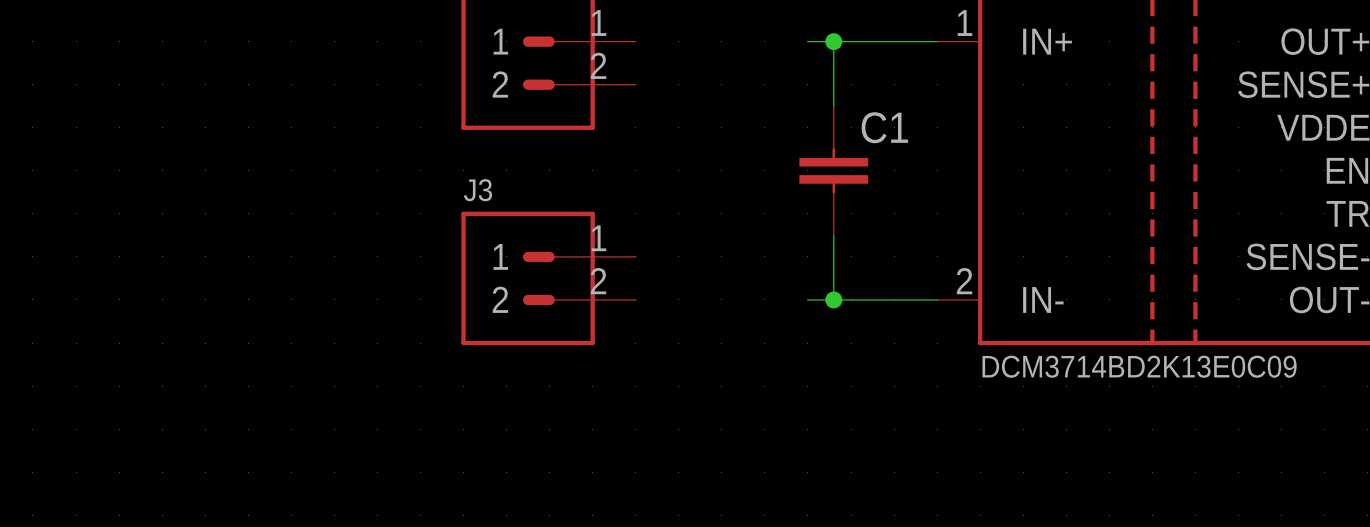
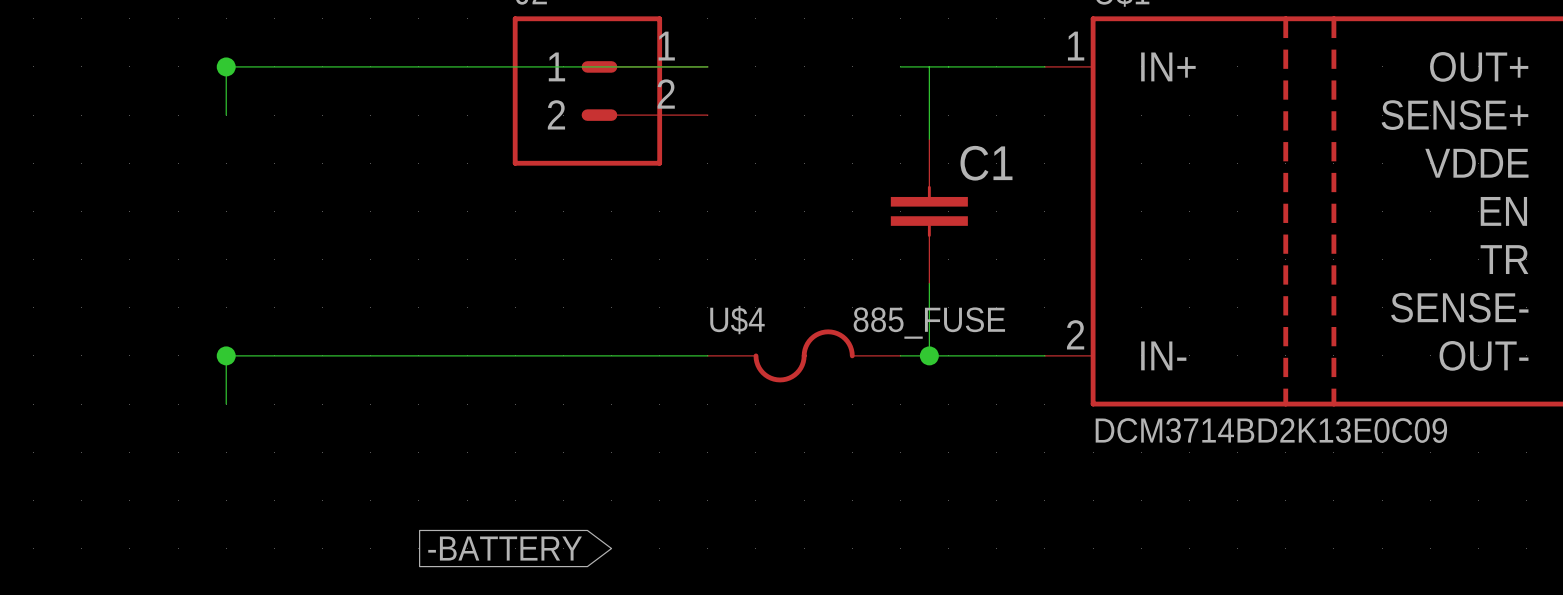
junction: none -> (226, 66)
wire: none -> (707, 66) (226, 66) (226, 115)
junction: (833, 41) -> none
J3: (548, 278) -> none
junction: none -> (226, 355)
wire: none -> (707, 355) (226, 355) (226, 404)
U$4: none -> 885_FUSE (804, 355)
global label: none -> -BATTERY (505, 548)

